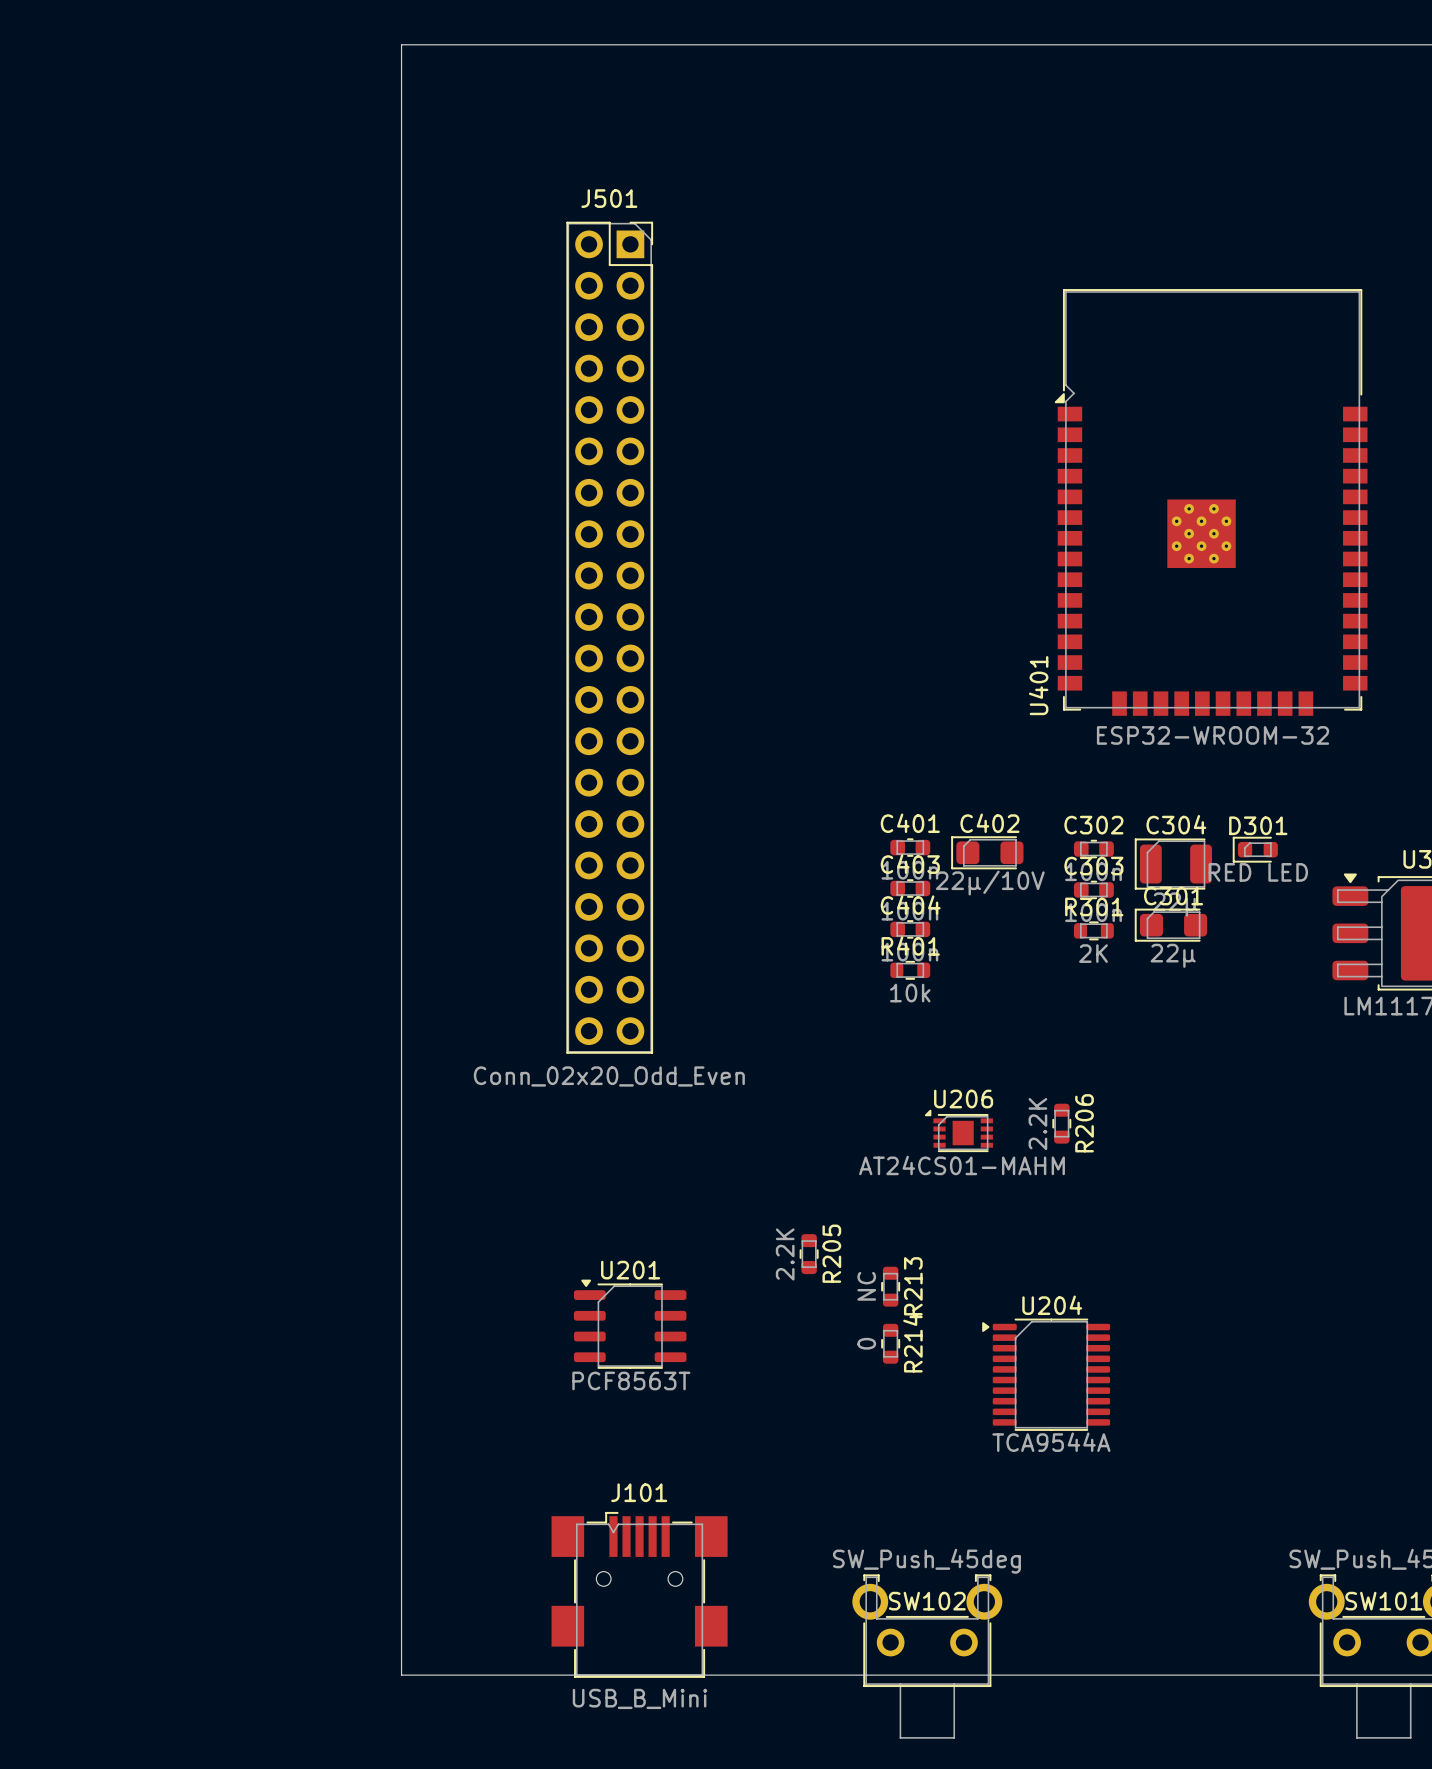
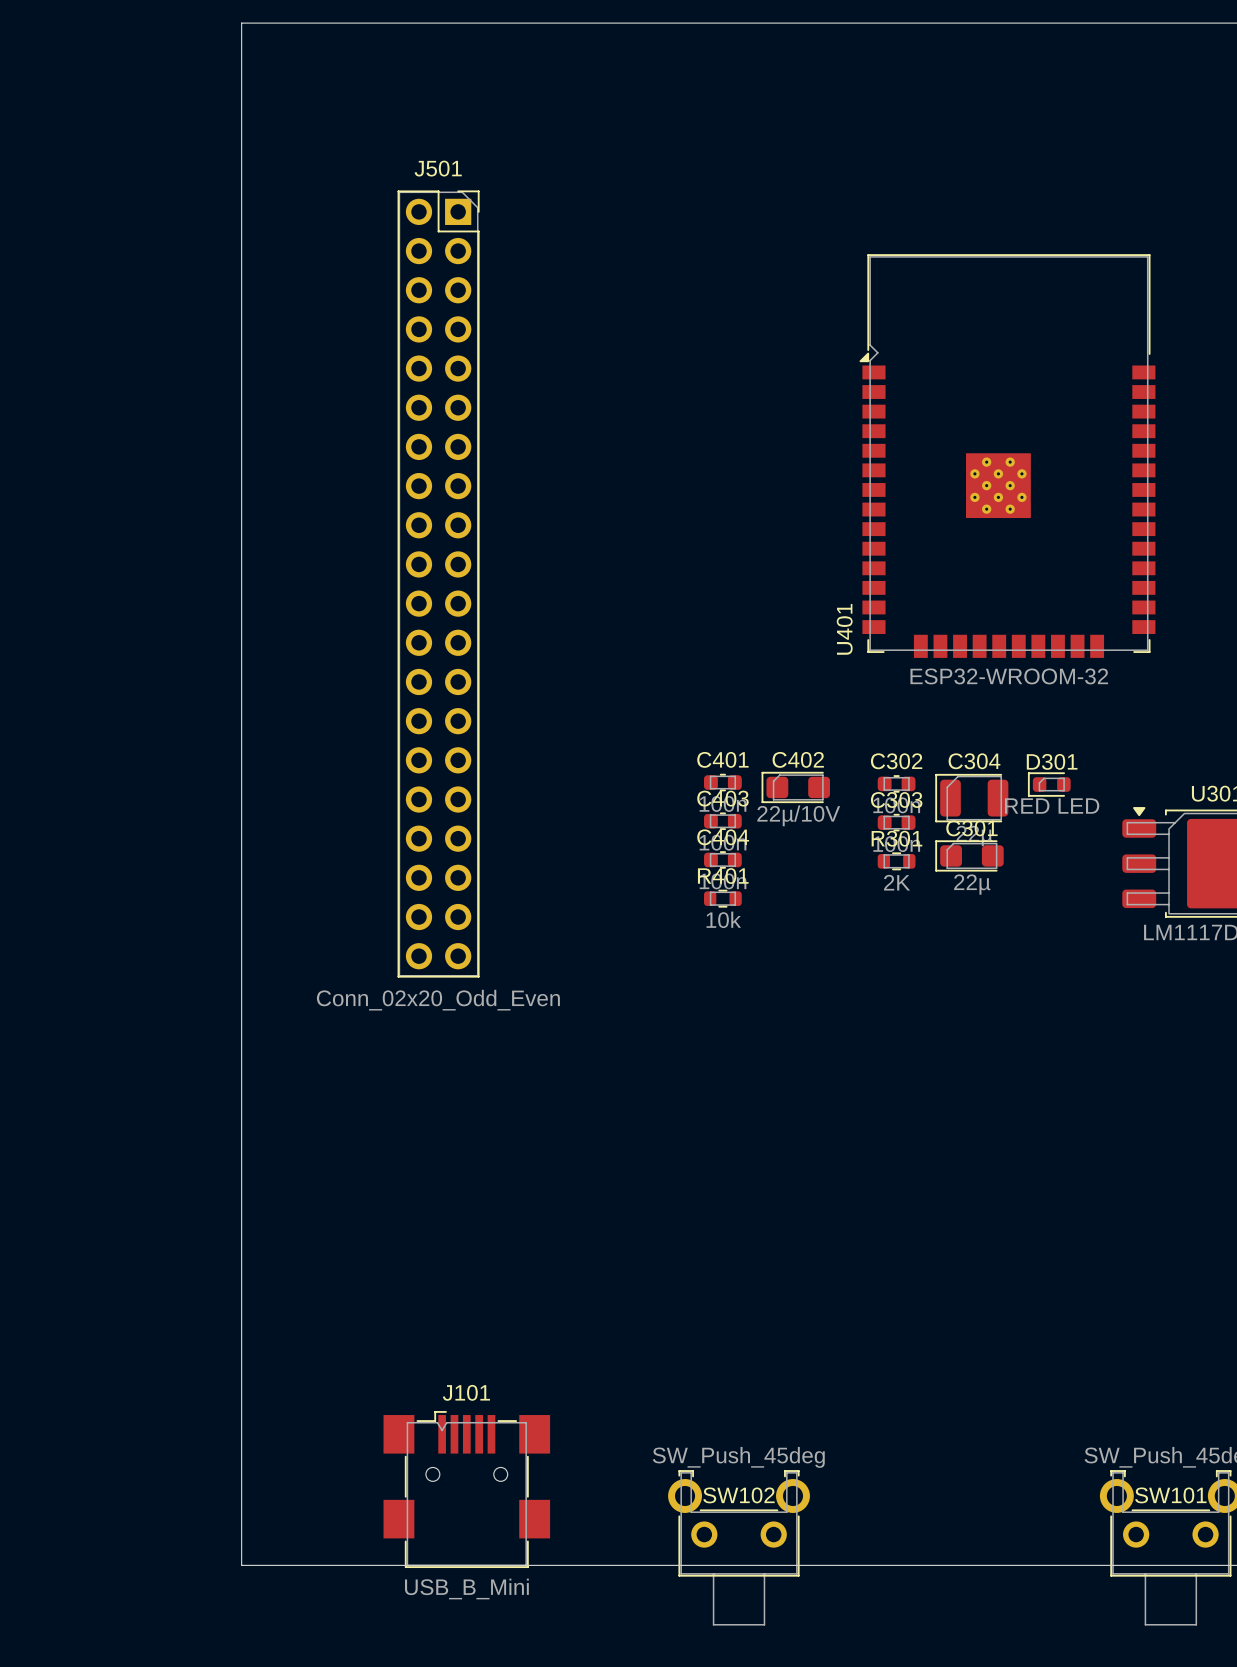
R206: 2.2K (1061, 1123) -> none
U206: AT24CS01-MAHM (958, 1130) -> none
R205: 2.2K (809, 1254) -> none
R213: NC (890, 1286) -> none
U201: PCF8563T (630, 1324) -> none
R214: 0 (890, 1343) -> none
U204: TCA9544A (1046, 1374) -> none

